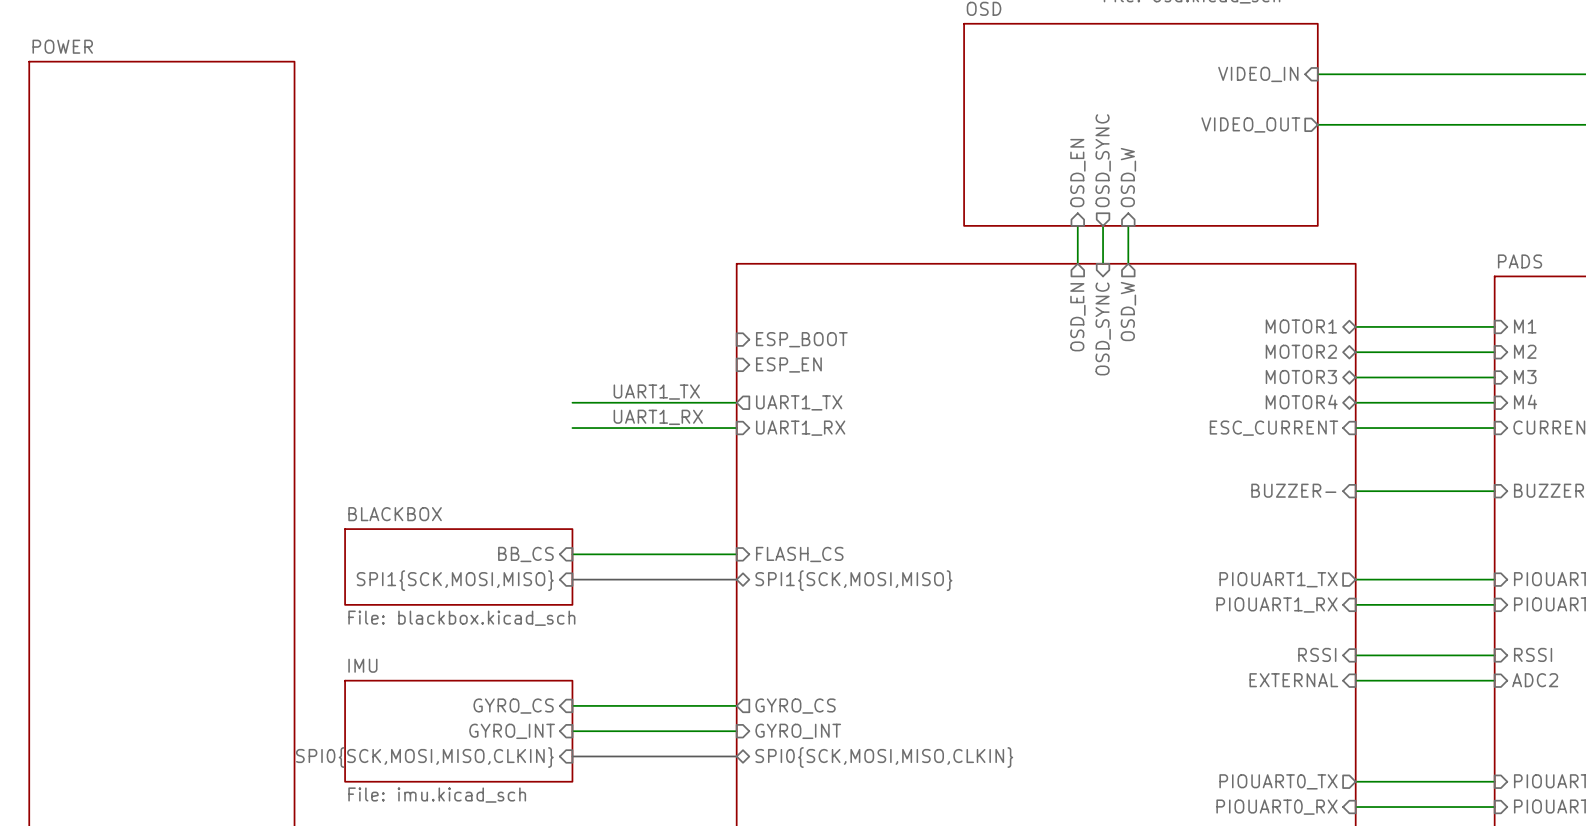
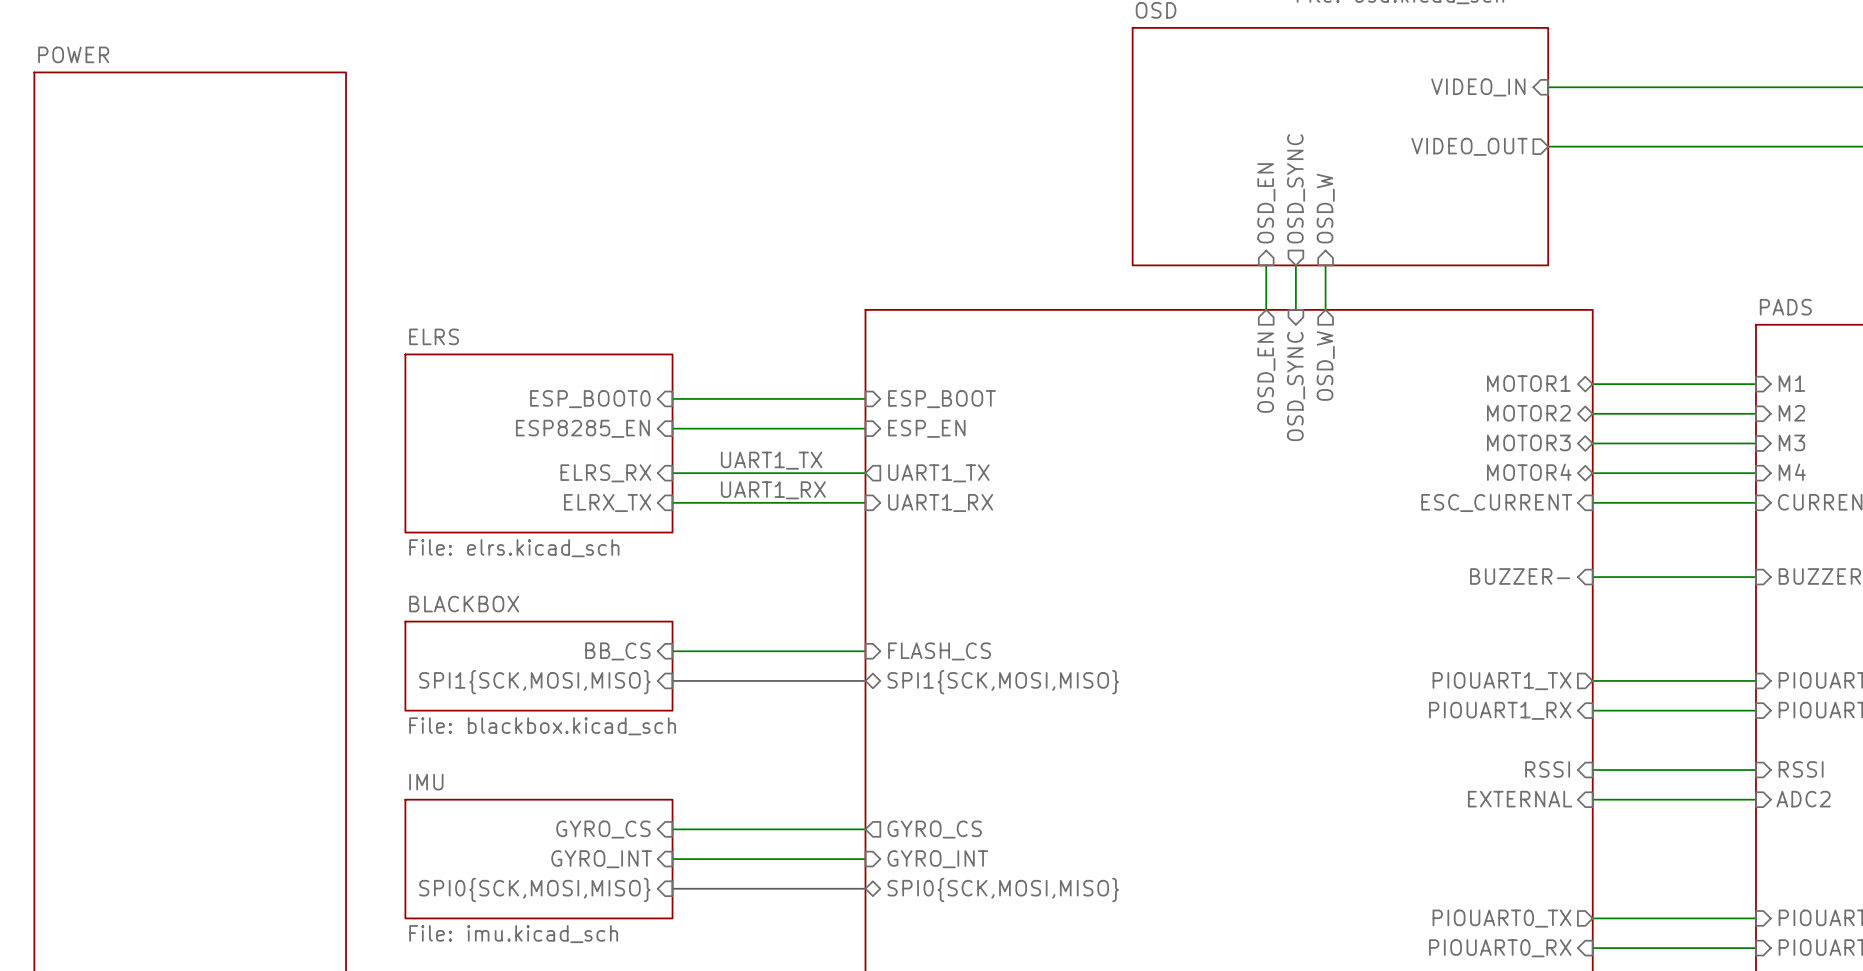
sheet pin: none -> ESP_BOOT0 (590, 399)
wire: none -> (672, 398) (865, 398)
sheet pin: none -> ESP8285_EN (582, 428)
wire: none -> (672, 428) (865, 428)
sheet ELRS: none -> File: elrs.kicad_sch (538, 443)
sheet pin: none -> ELRS_RX (605, 473)
sheet pin: none -> ELRX_TX (607, 503)
sheet pin: SPI0{SCK,MOSI,MISO,CLKIN} (424, 757) -> SPI0{SCK,MOSI,MISO} (534, 889)
sheet pin: SPI0{SCK,MOSI,MISO,CLKIN} (884, 757) -> SPI0{SCK,MOSI,MISO} (1003, 889)

